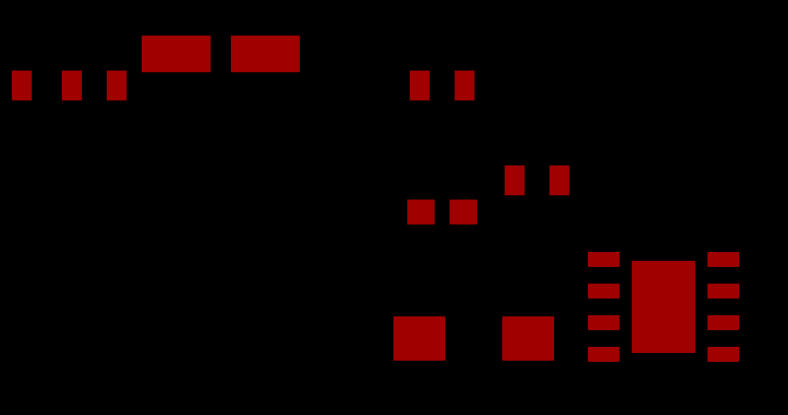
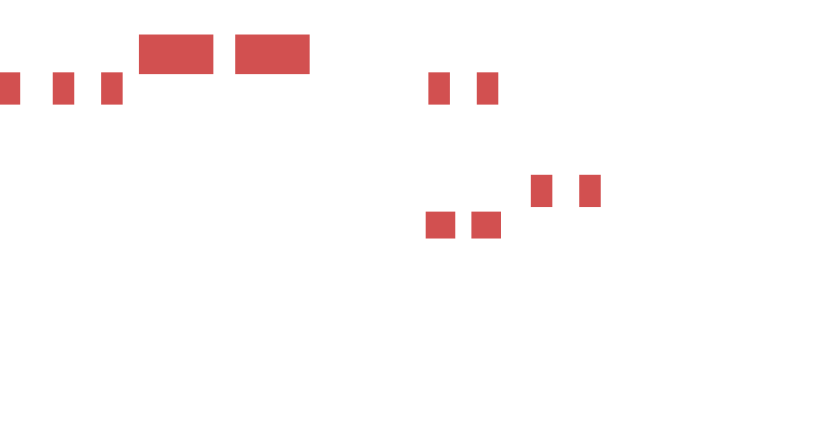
part: (663, 306) -> none
part: (473, 338) -> none

